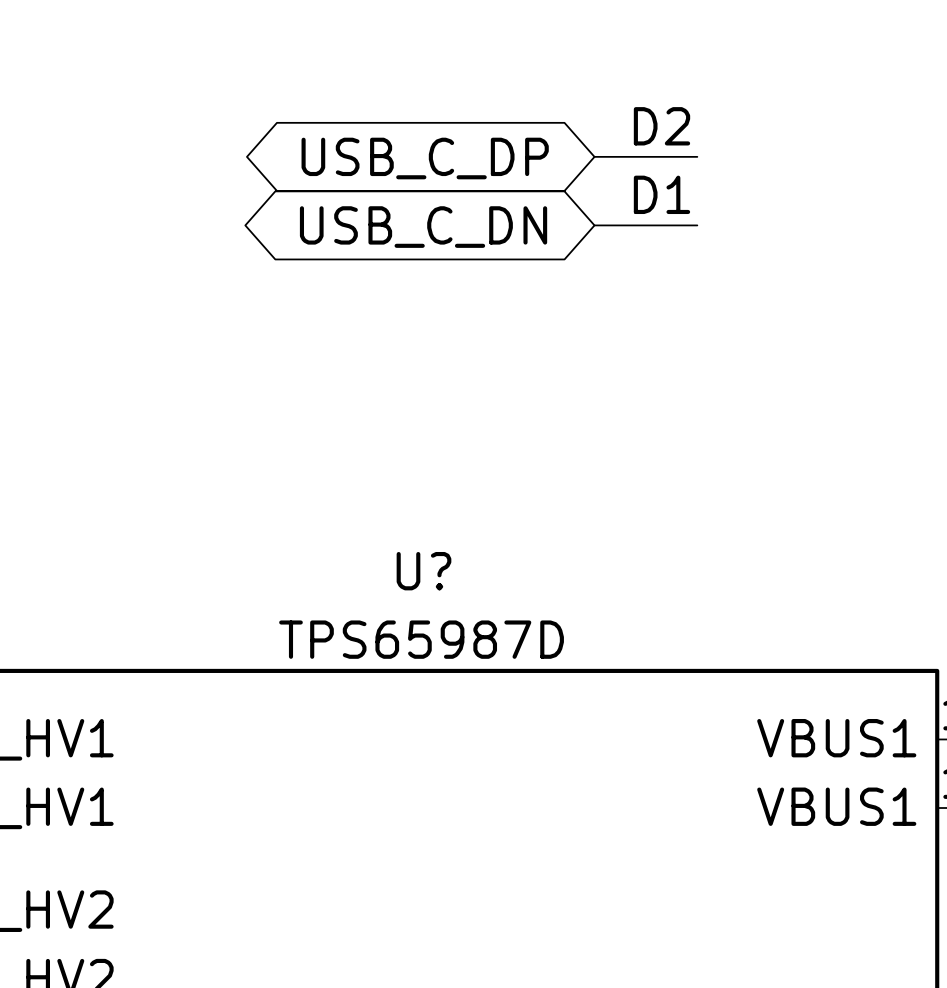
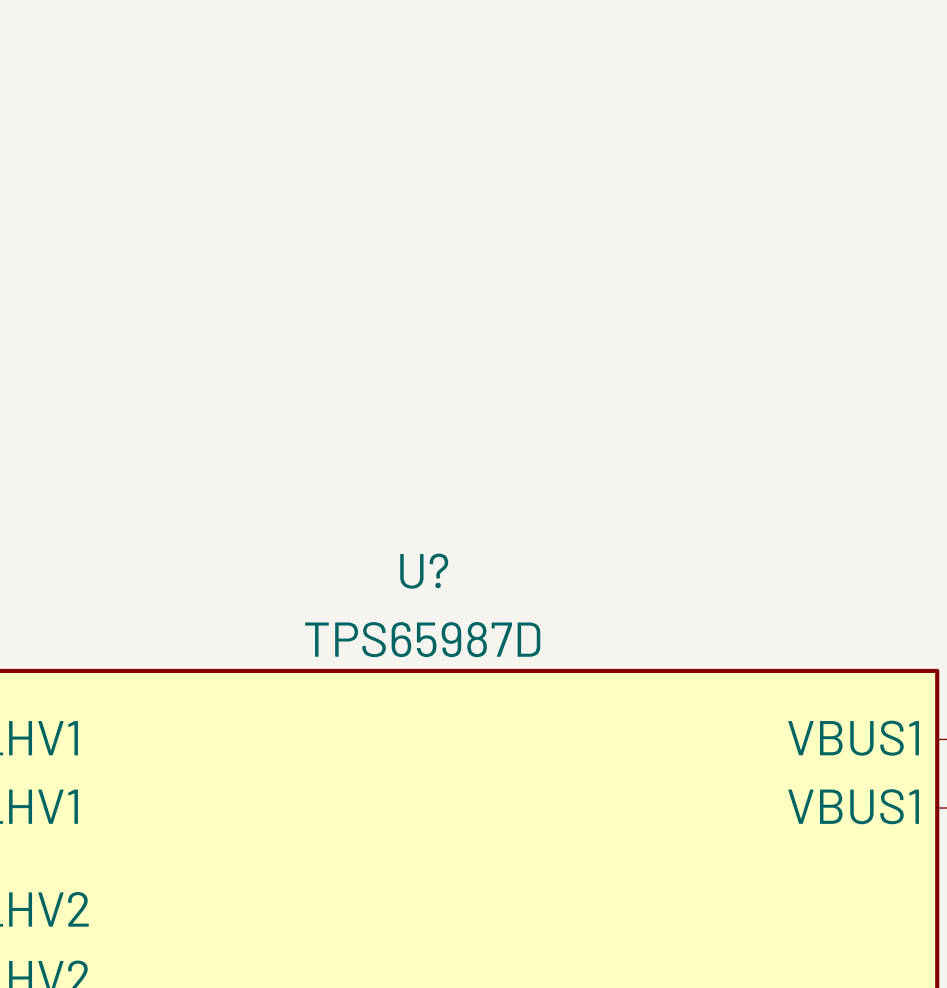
label: D2 (661, 126) -> none
wire: (594, 156) (697, 156) -> none
global label: USB_C_DP (425, 158) -> none
label: D1 (661, 194) -> none
wire: (594, 225) (697, 225) -> none
global label: USB_C_DN (423, 227) -> none

